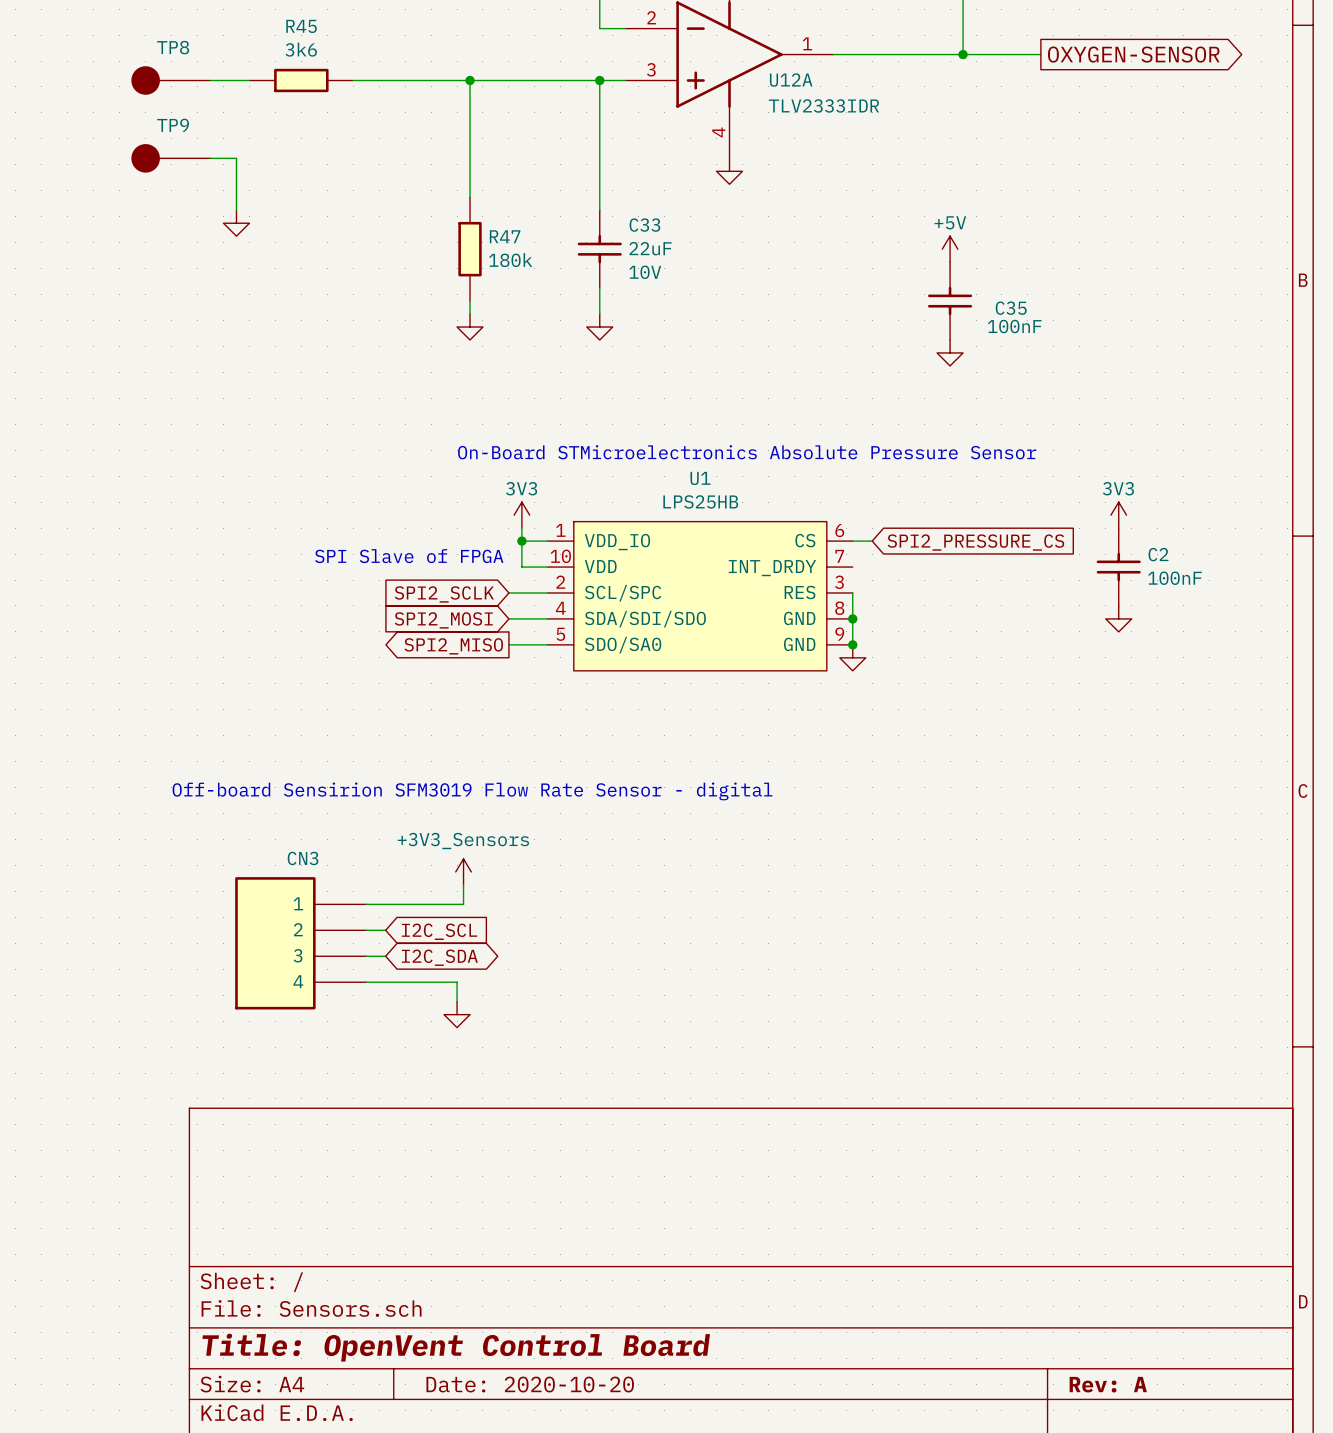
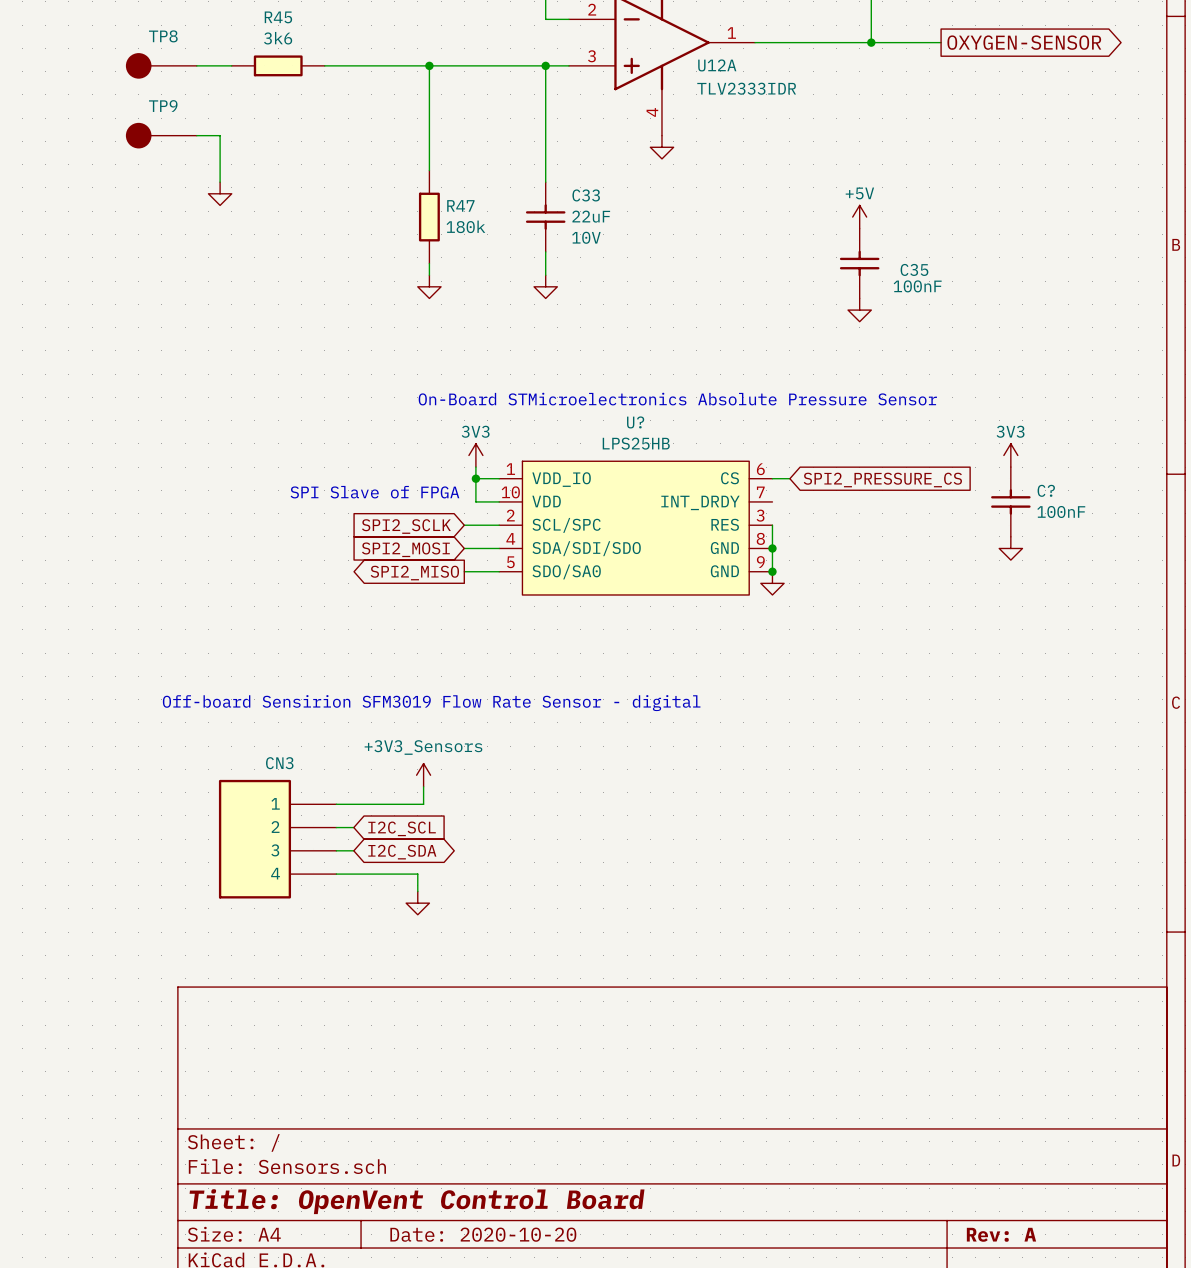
U1 name: U1 (700, 478) -> U? (635, 422)
C2 name: C2 (1158, 554) -> C? (1046, 490)

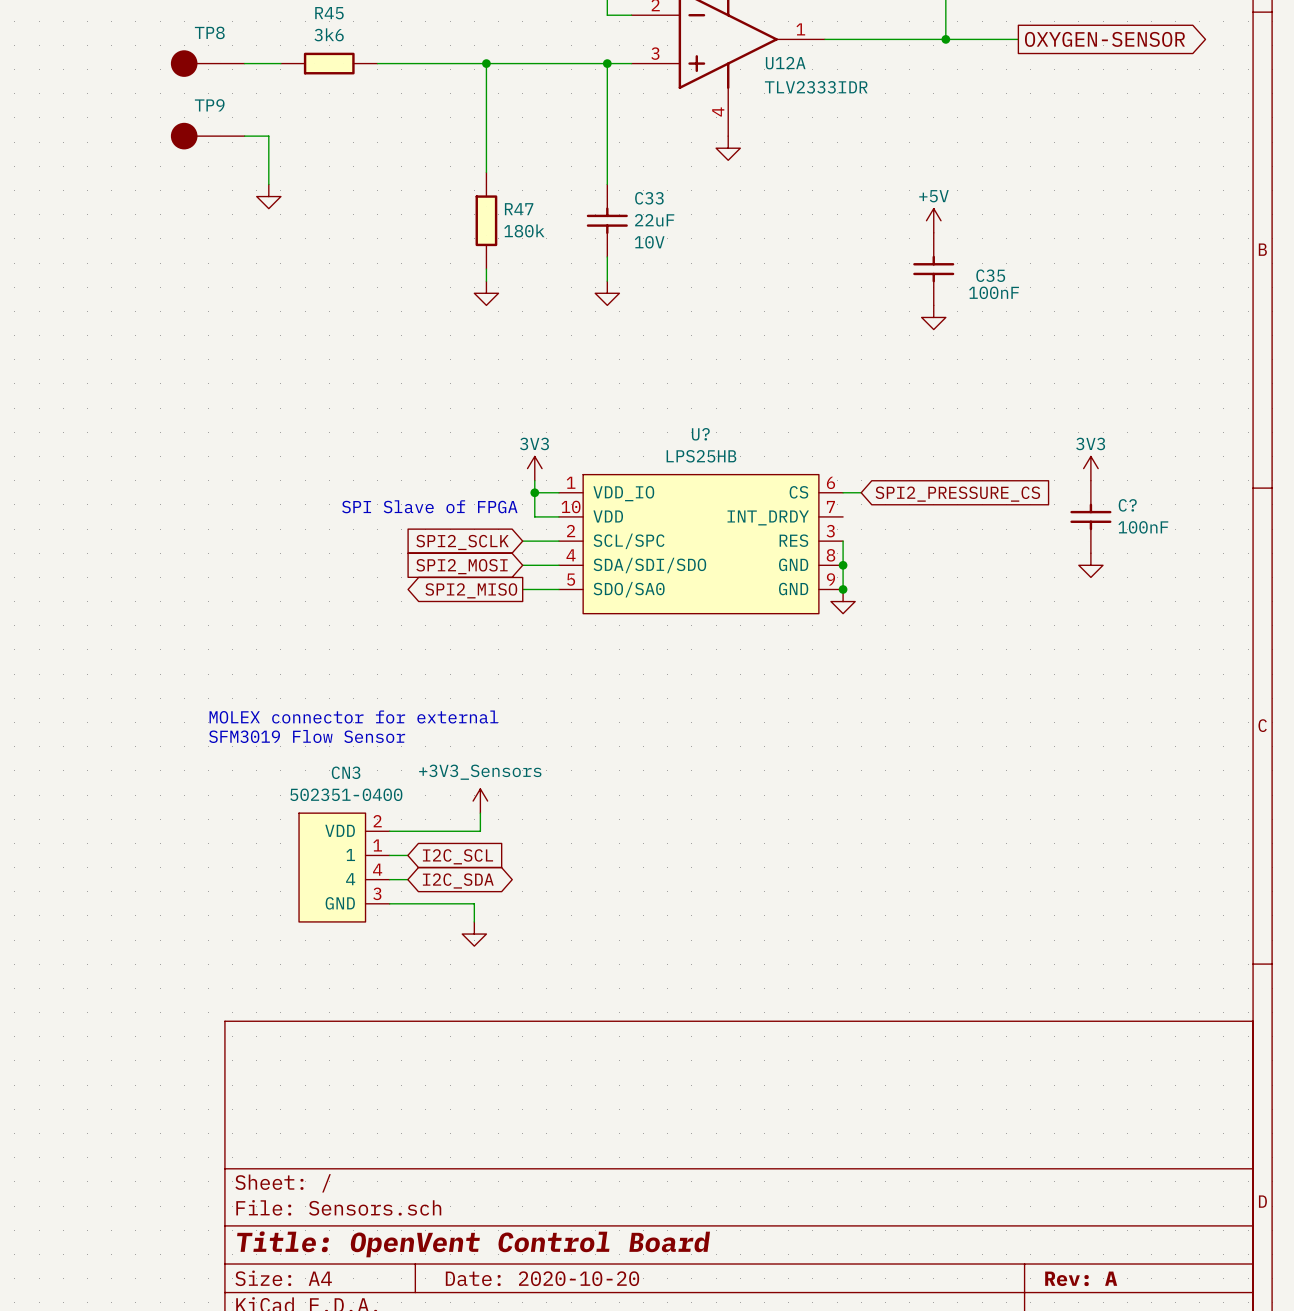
text: On-Board STMicroelectronics Absolute Pressure Sensor (677, 399) -> none
text: none -> MOLEX connector for external (353, 717)
text: Off-board Sensirion SFM3019 Flow Rate Sensor - digital (431, 703) -> none
text: none -> SFM3019 Flow Sensor (307, 736)
CN3 value: none -> 502351-0400 (346, 794)
CN3 symbol: [218, 779, 337, 899] -> [299, 813, 390, 922]

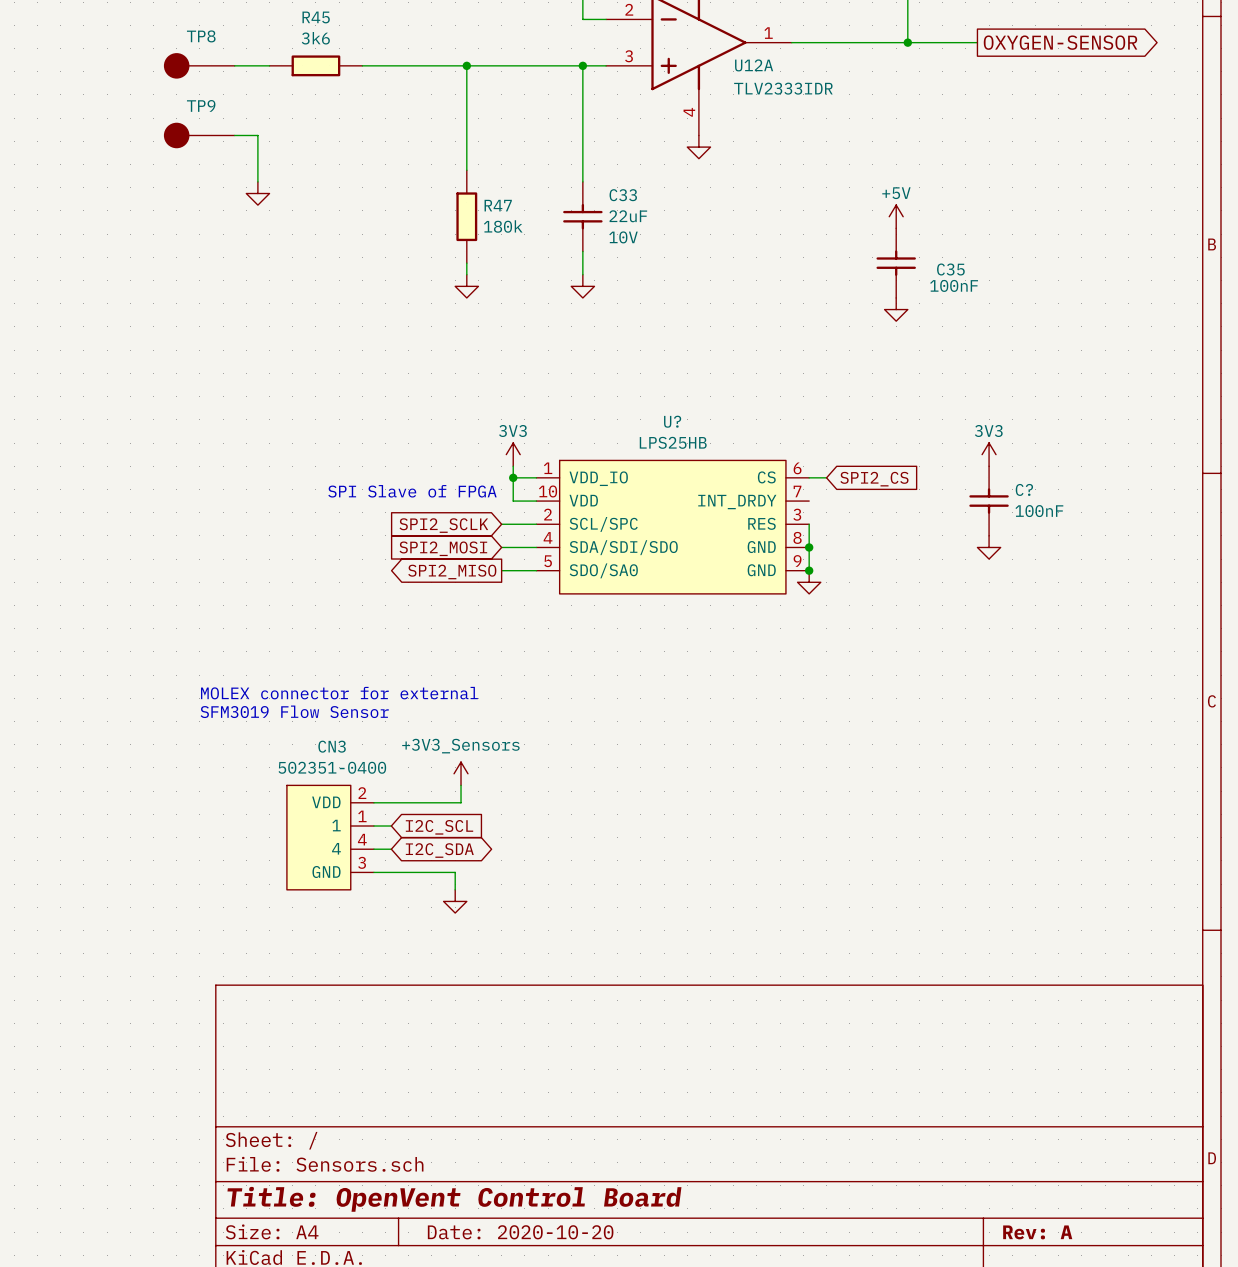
power symbol position: 3V3 (1090, 468) -> 3V3 (989, 454)
global label: SPI2_PRESSURE_CS (957, 494) -> SPI2_CS (874, 479)
C? position: (1090, 516) -> (989, 501)
power symbol position: (1090, 565) -> (989, 547)

